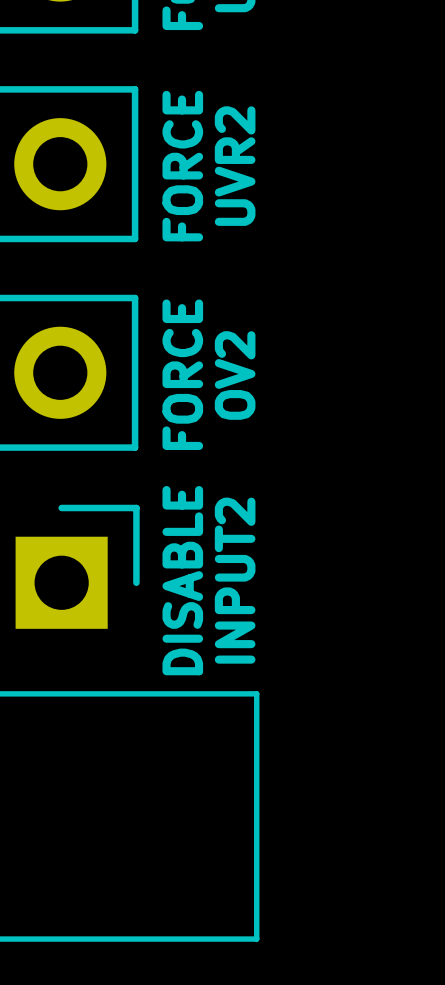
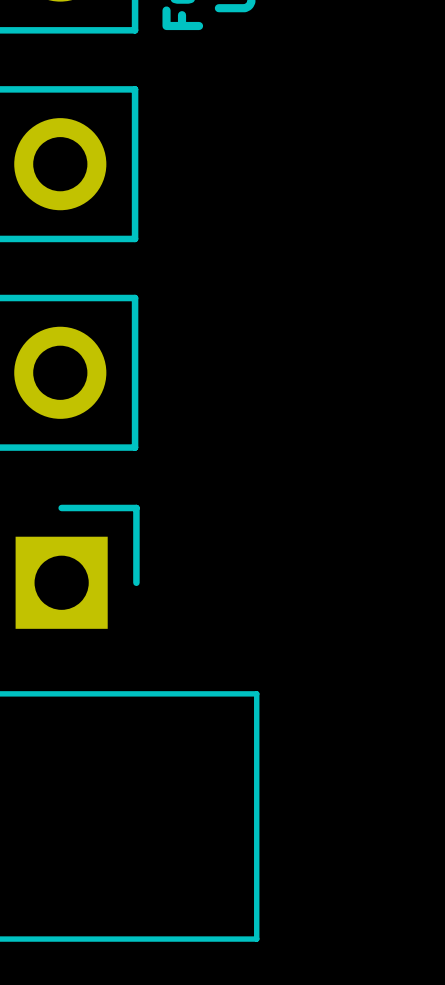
text: FORCE (182, 166) -> none
text: UVR2 (235, 166) -> none
text: FORCE (182, 374) -> none
text: OV2 (235, 375) -> none
text: DISABLE (182, 580) -> none
text: INPUT2 (235, 580) -> none

